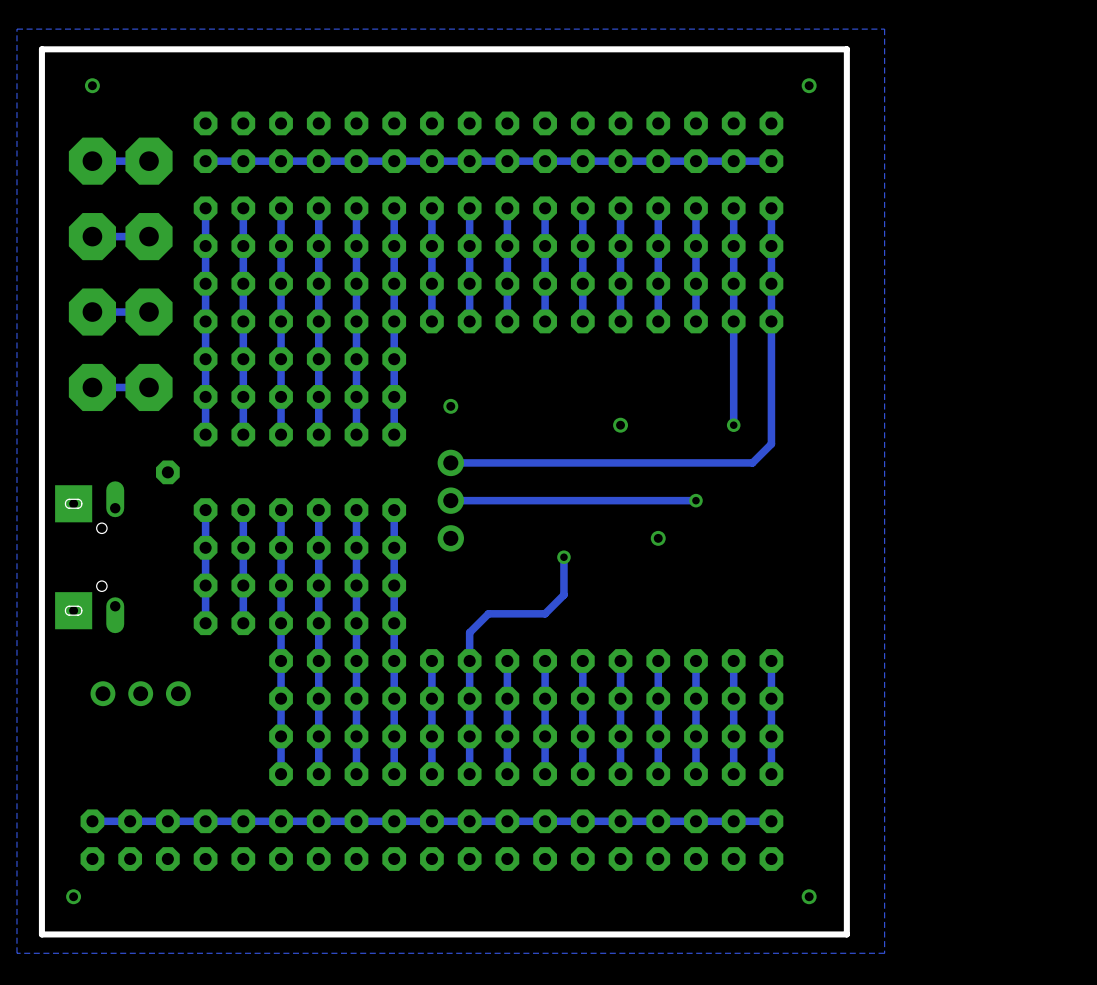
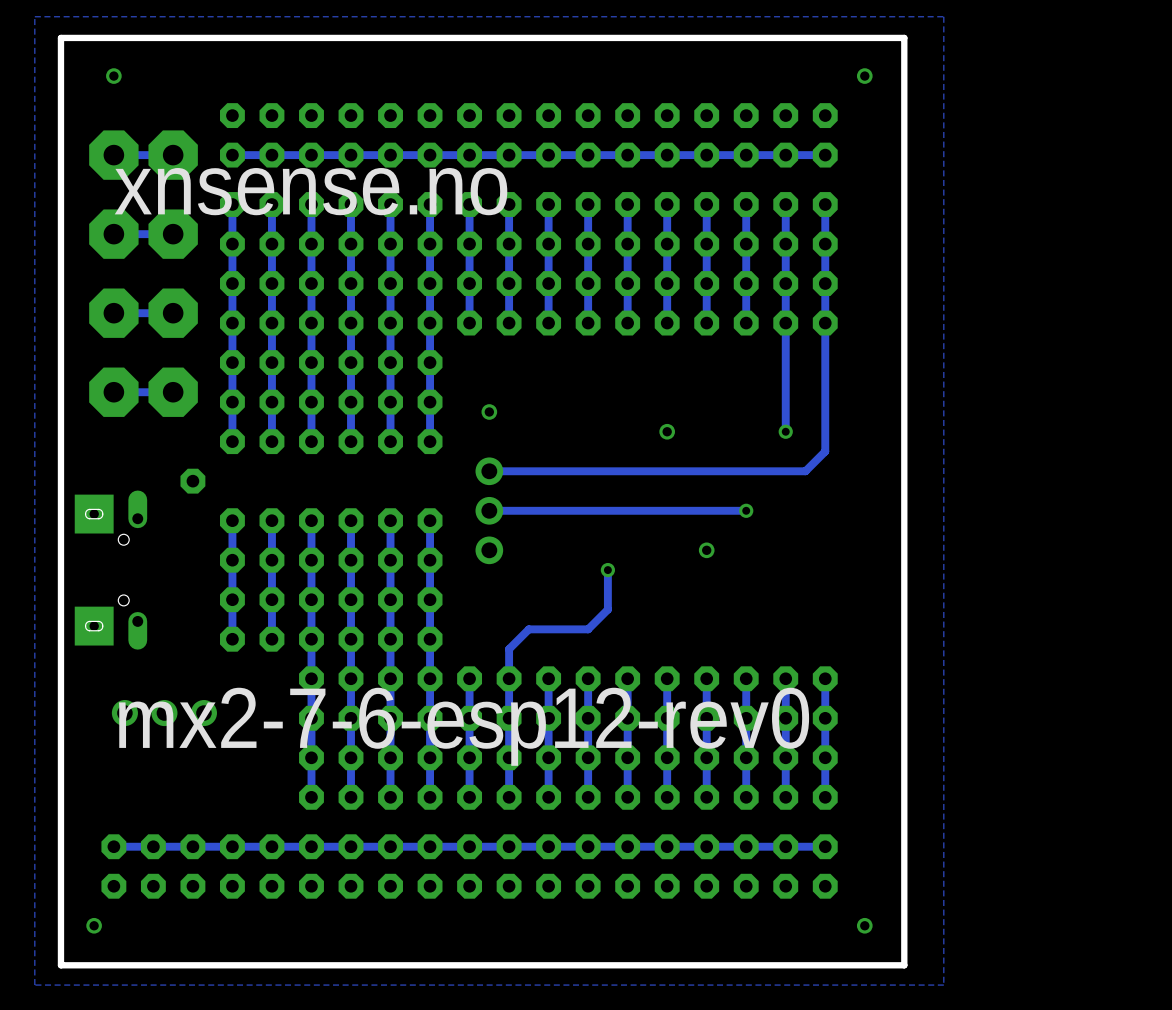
text: none -> xnsense.no (311, 191)
text: none -> mx2-7-6-esp12-rev0 (464, 726)

